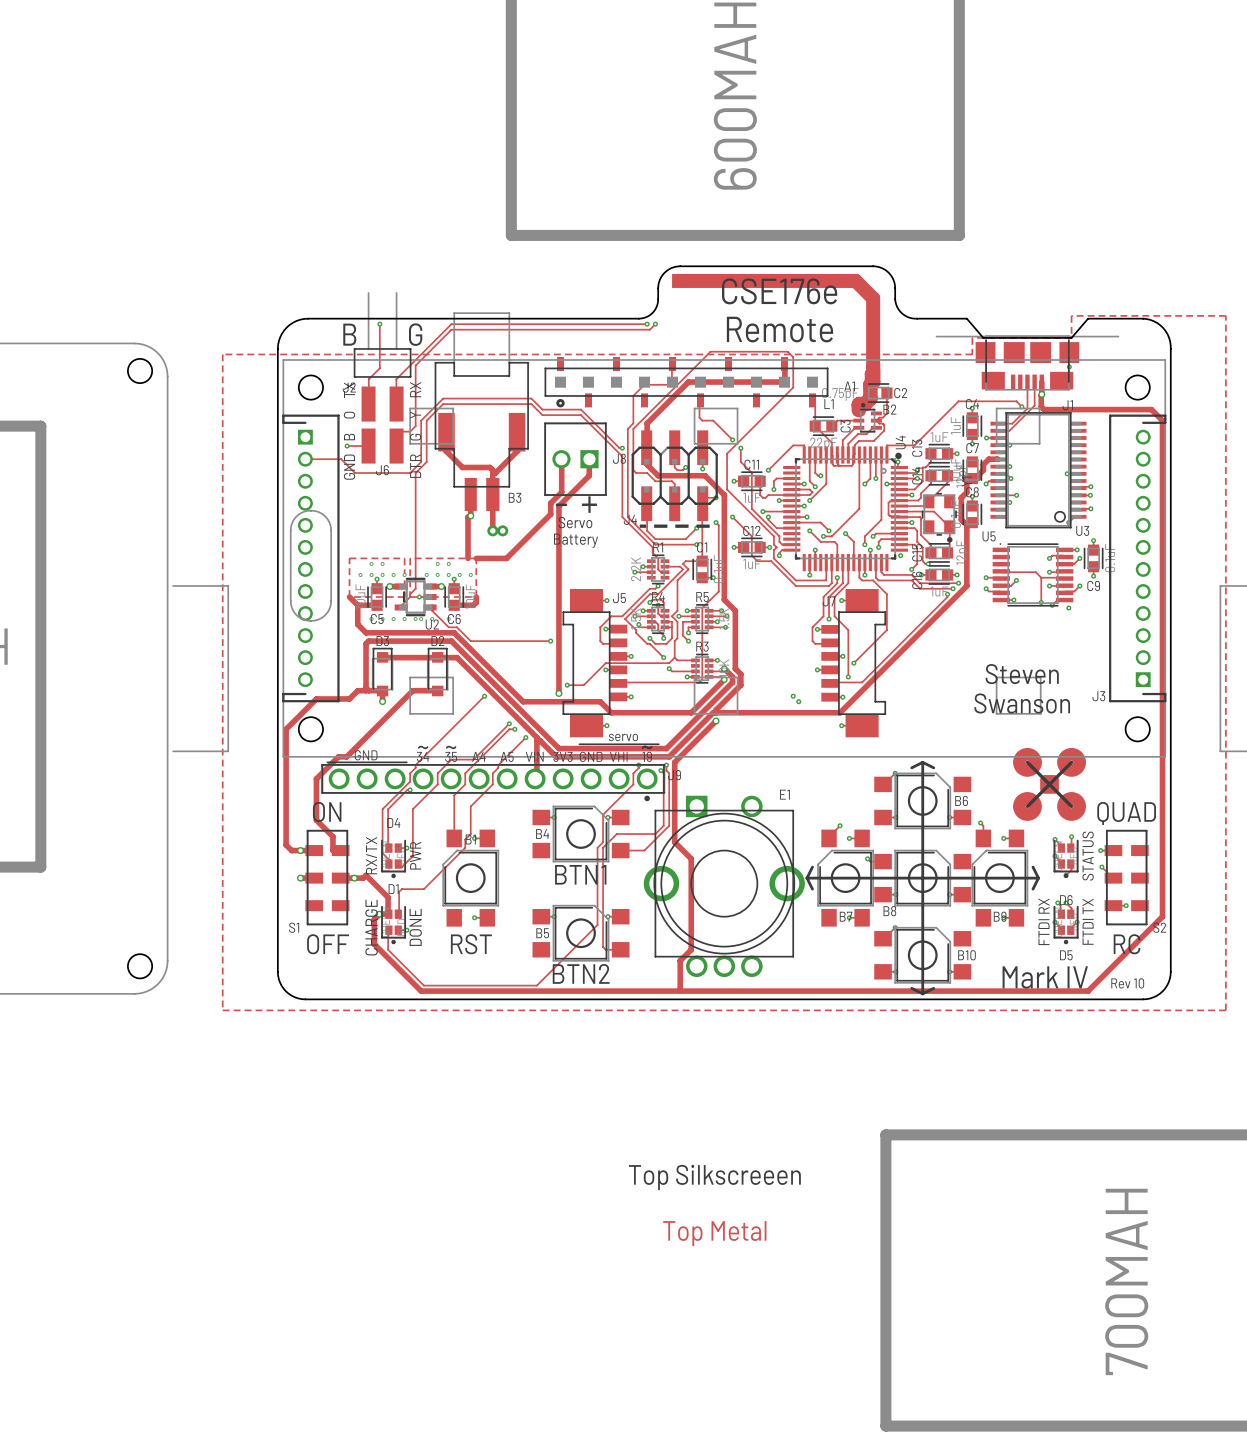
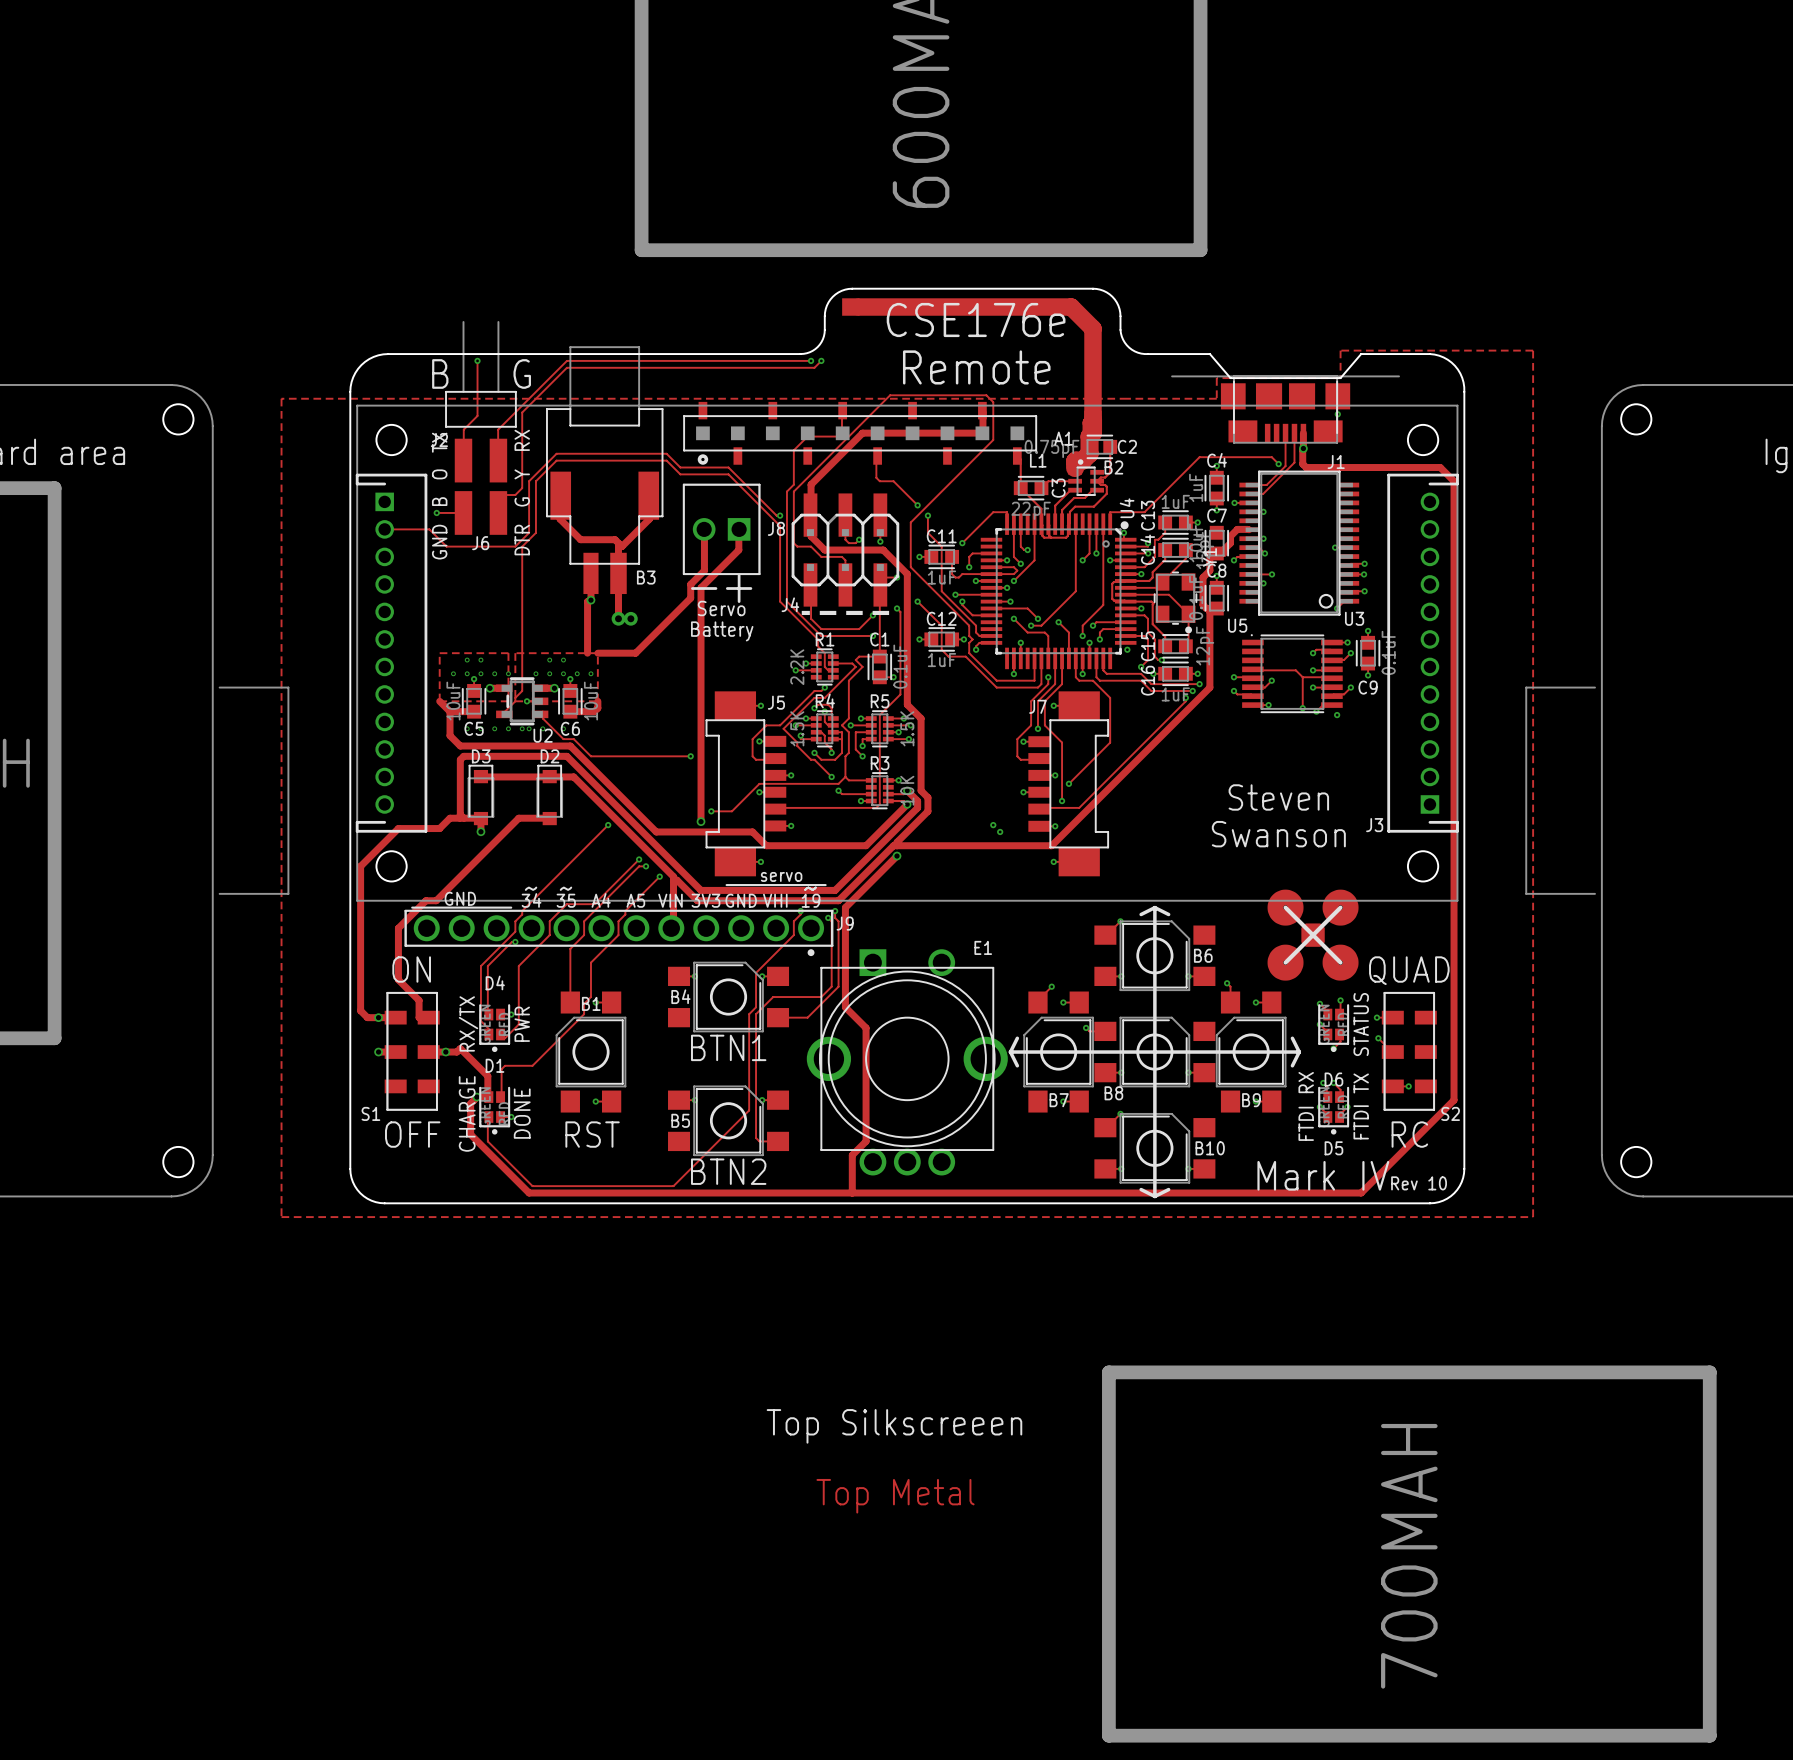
L1 footprint: [282, 357, 1166, 758] -> [356, 401, 1459, 902]

